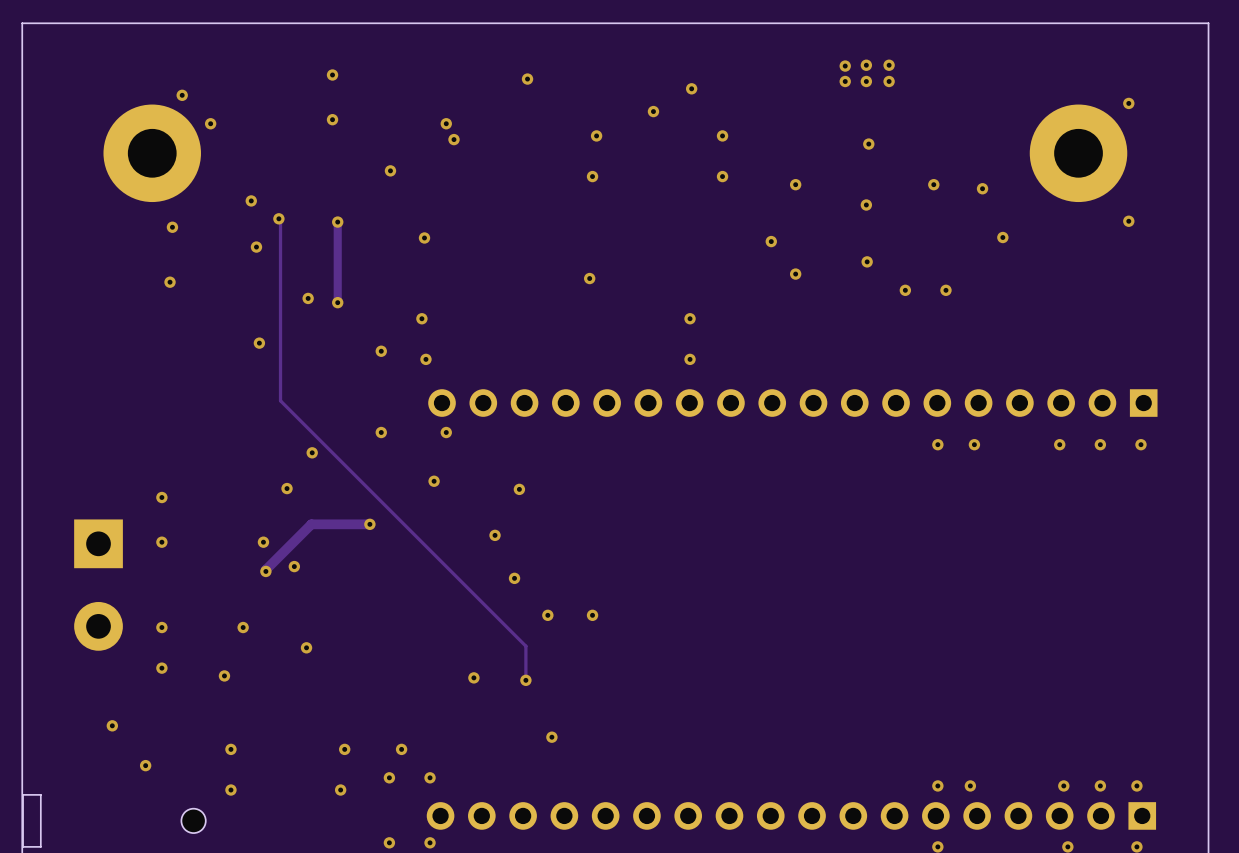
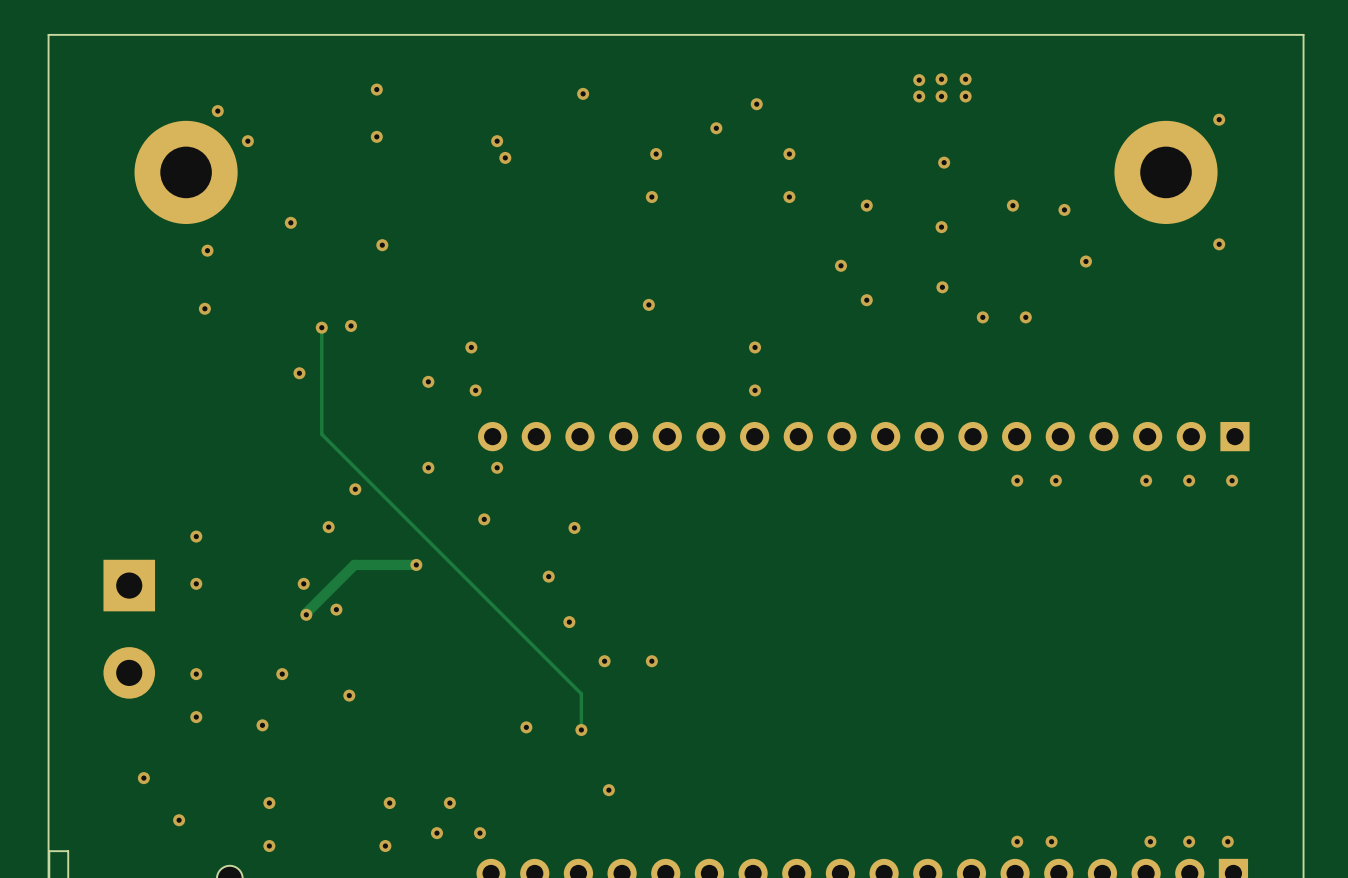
via: (390, 170) -> none
track: (278, 218) (280, 220) (280, 300) -> none
via: (278, 218) -> none
track: (337, 222) (337, 302) -> none
via: (424, 237) -> none
via: (256, 247) -> none
via: none -> (321, 327)
via: (337, 302) -> none

